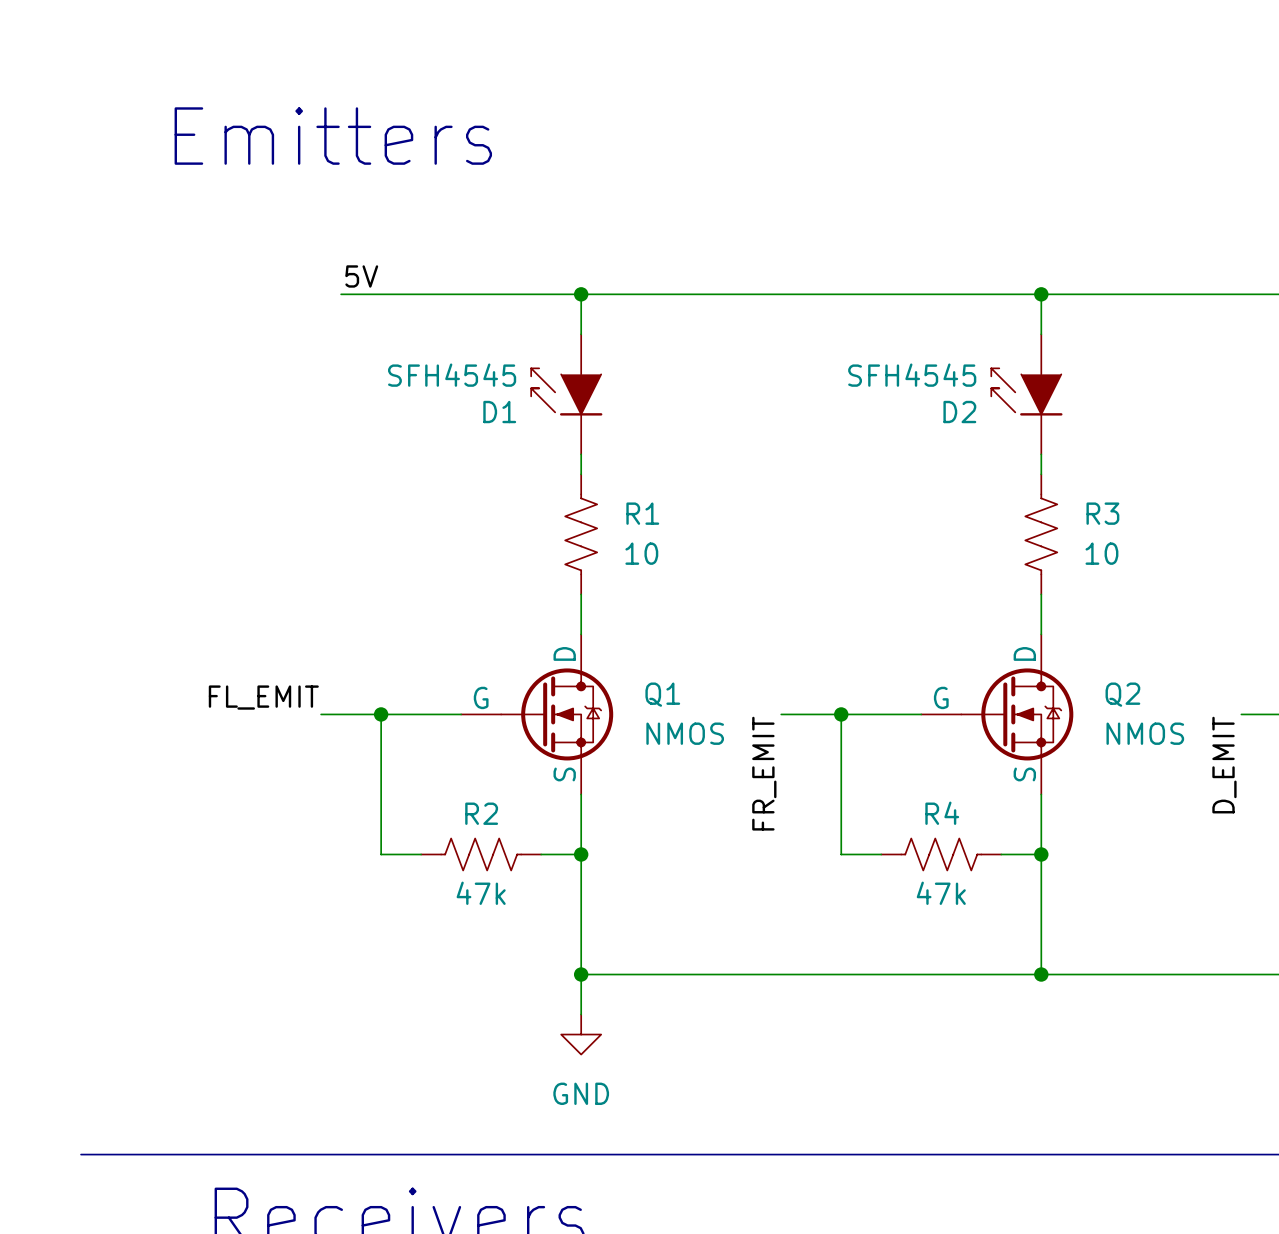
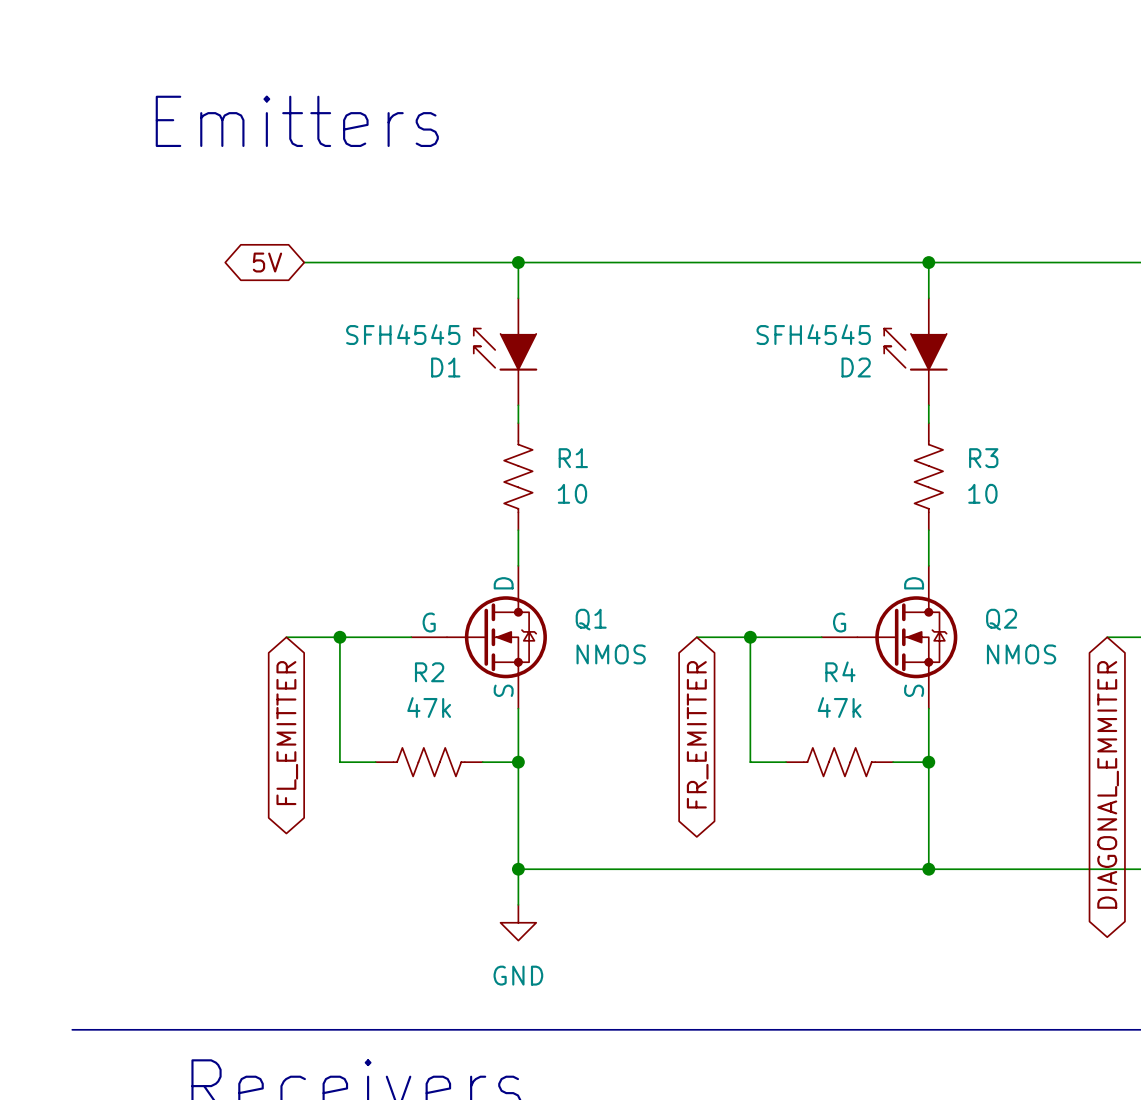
label: 5V (361, 276) -> none
global label: none -> 5V (267, 262)
label: FL_EMIT (263, 697) -> none
label: D_EMIT (1224, 765) -> none
label: FR_EMIT (764, 773) -> none
R2 name position: R2 (481, 813) -> R2 (429, 672)
R4 name position: R4 (942, 813) -> R4 (840, 671)
global label: none -> FL_EMITTER (287, 733)
global label: none -> FR_EMITTER (697, 734)
global label: none -> DIAGONAL_EMMITER (1108, 784)
R2 value position: 47k (481, 893) -> 47k (429, 707)
R4 value position: 47k (941, 893) -> 47k (839, 707)

